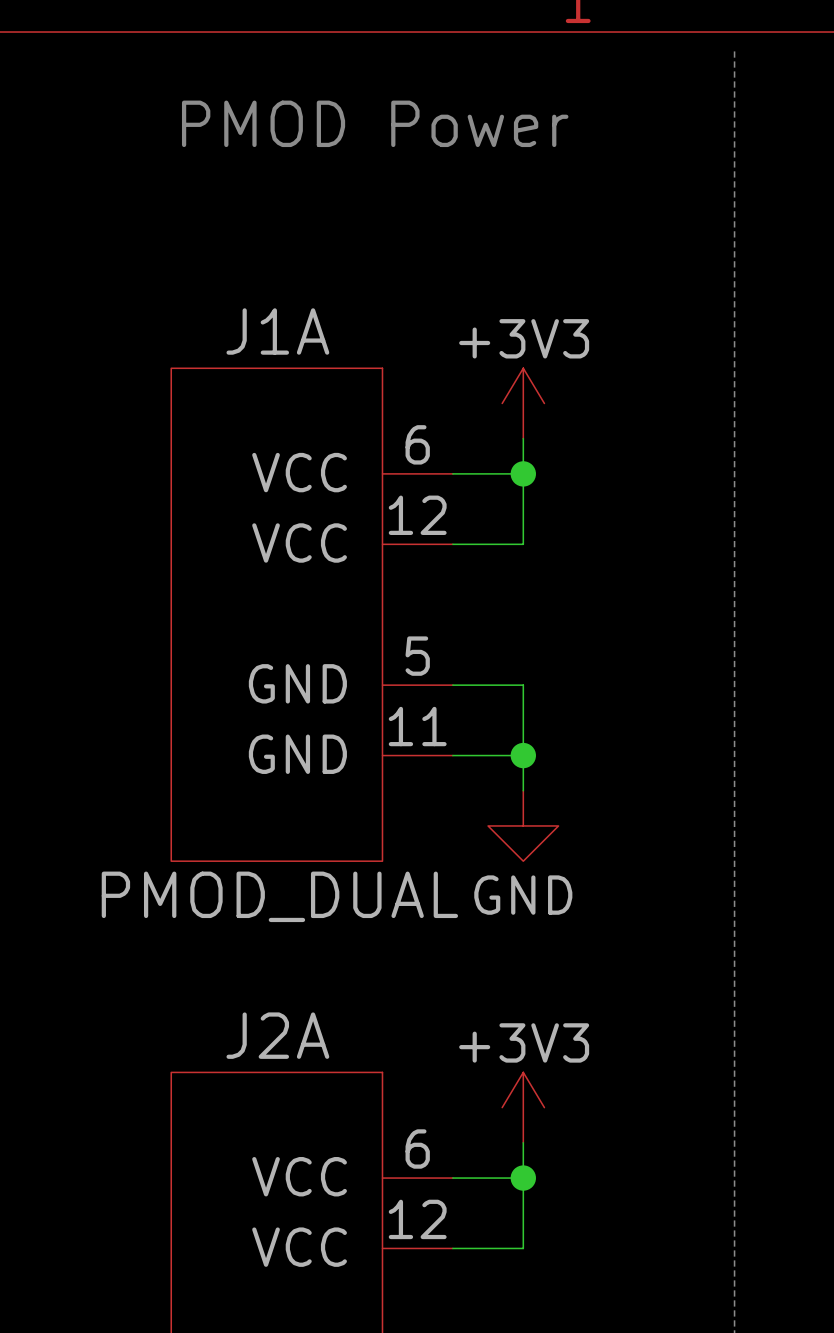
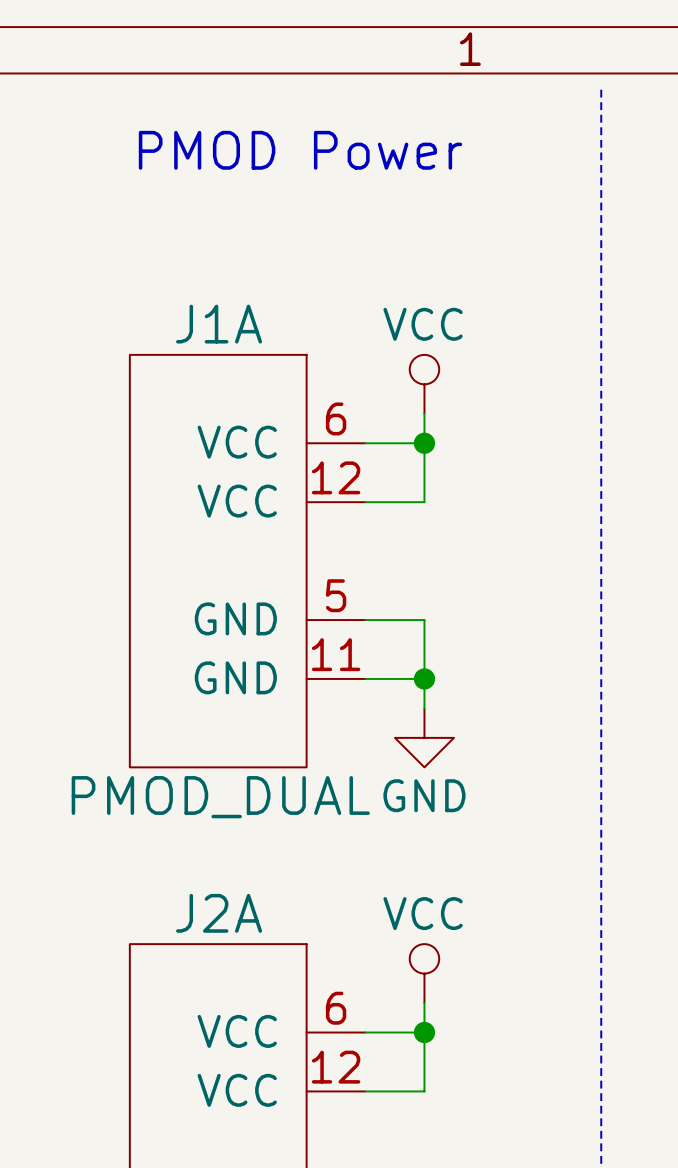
power symbol: +3V3 (523, 403) -> VCC (424, 384)
power symbol: +3V3 (523, 1107) -> VCC (424, 973)

